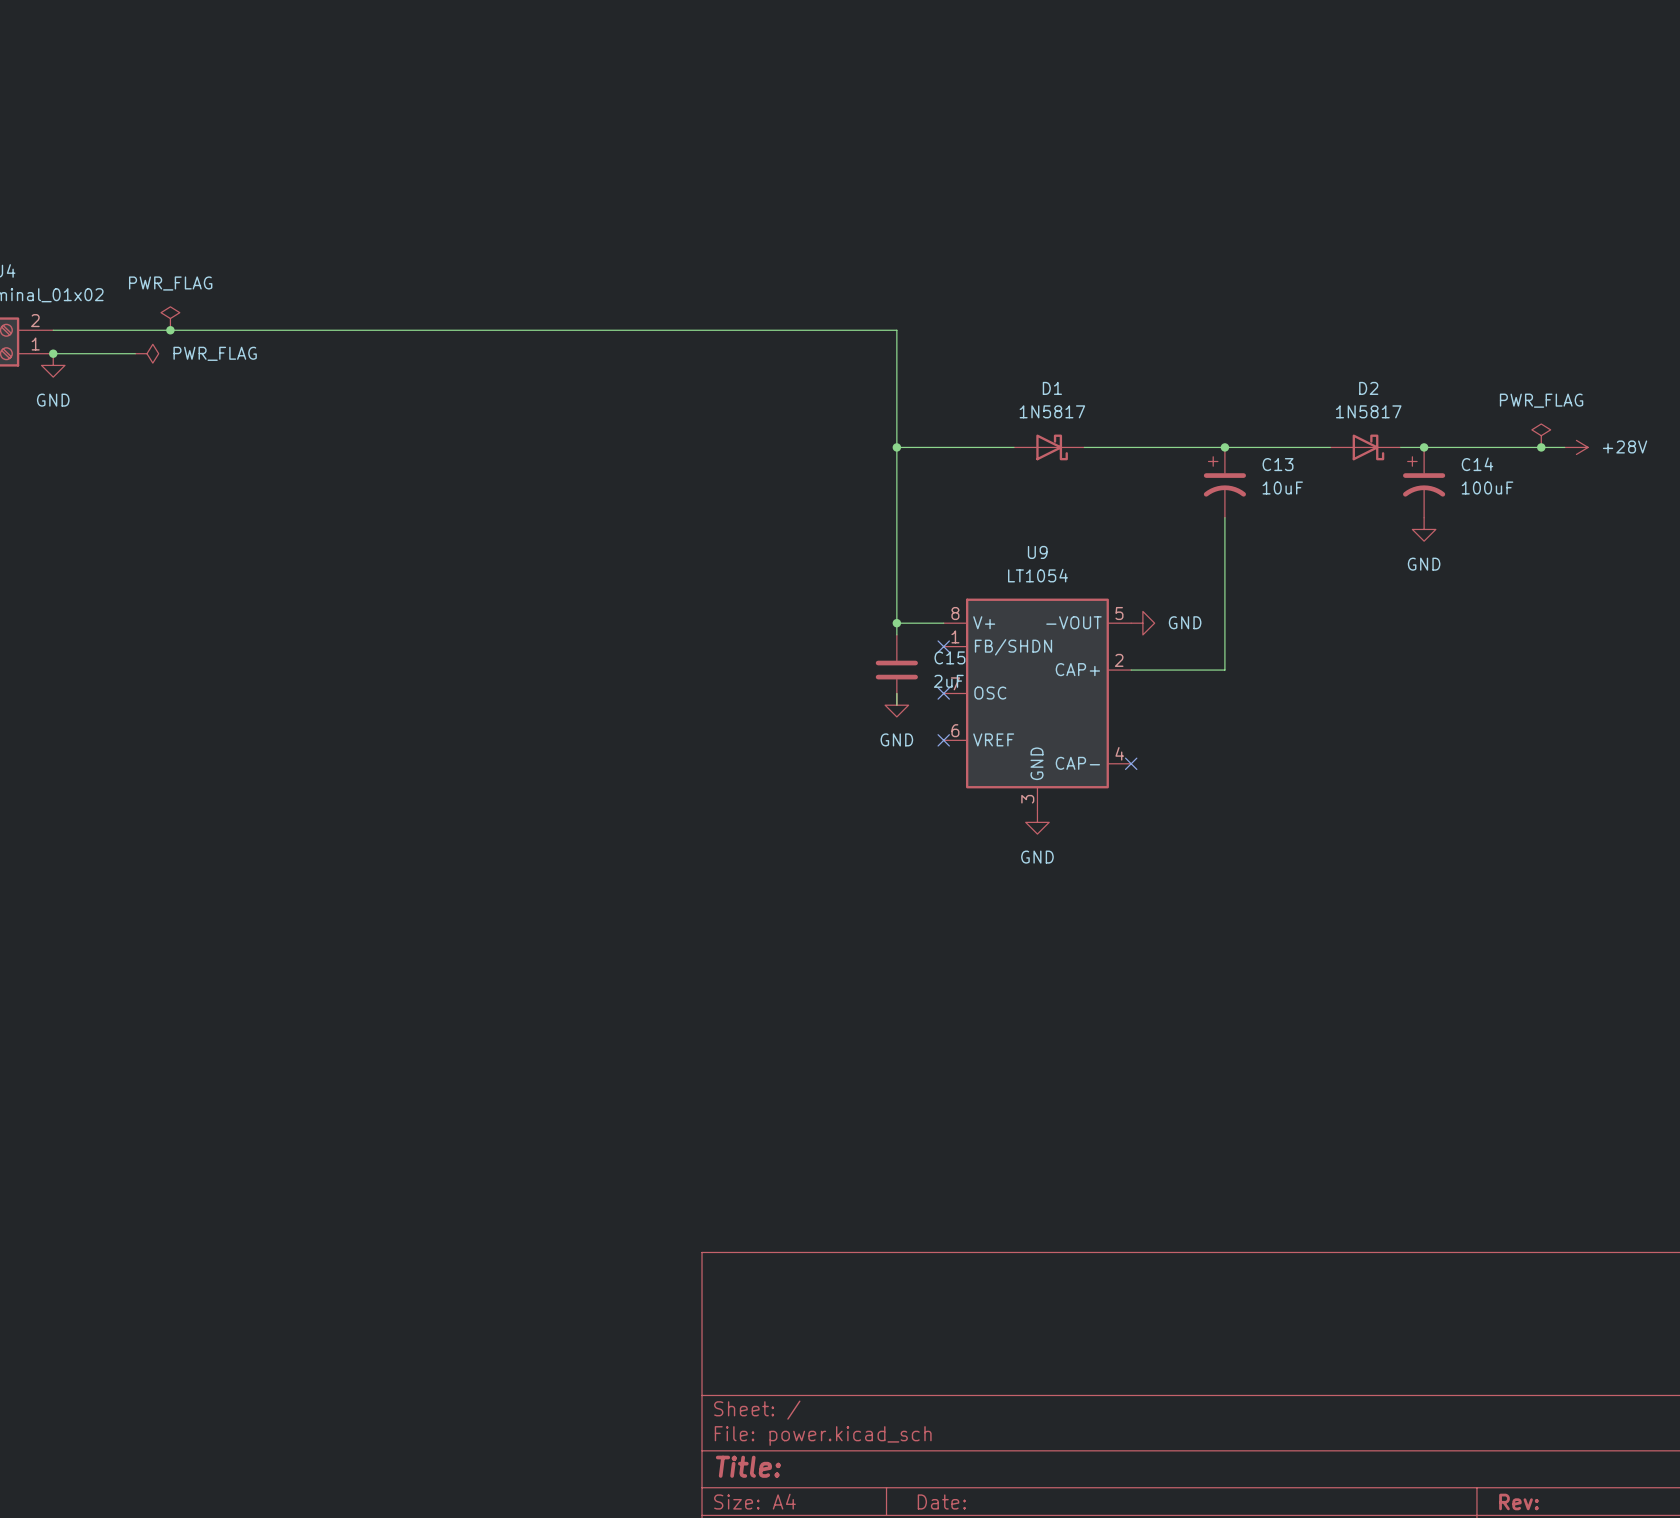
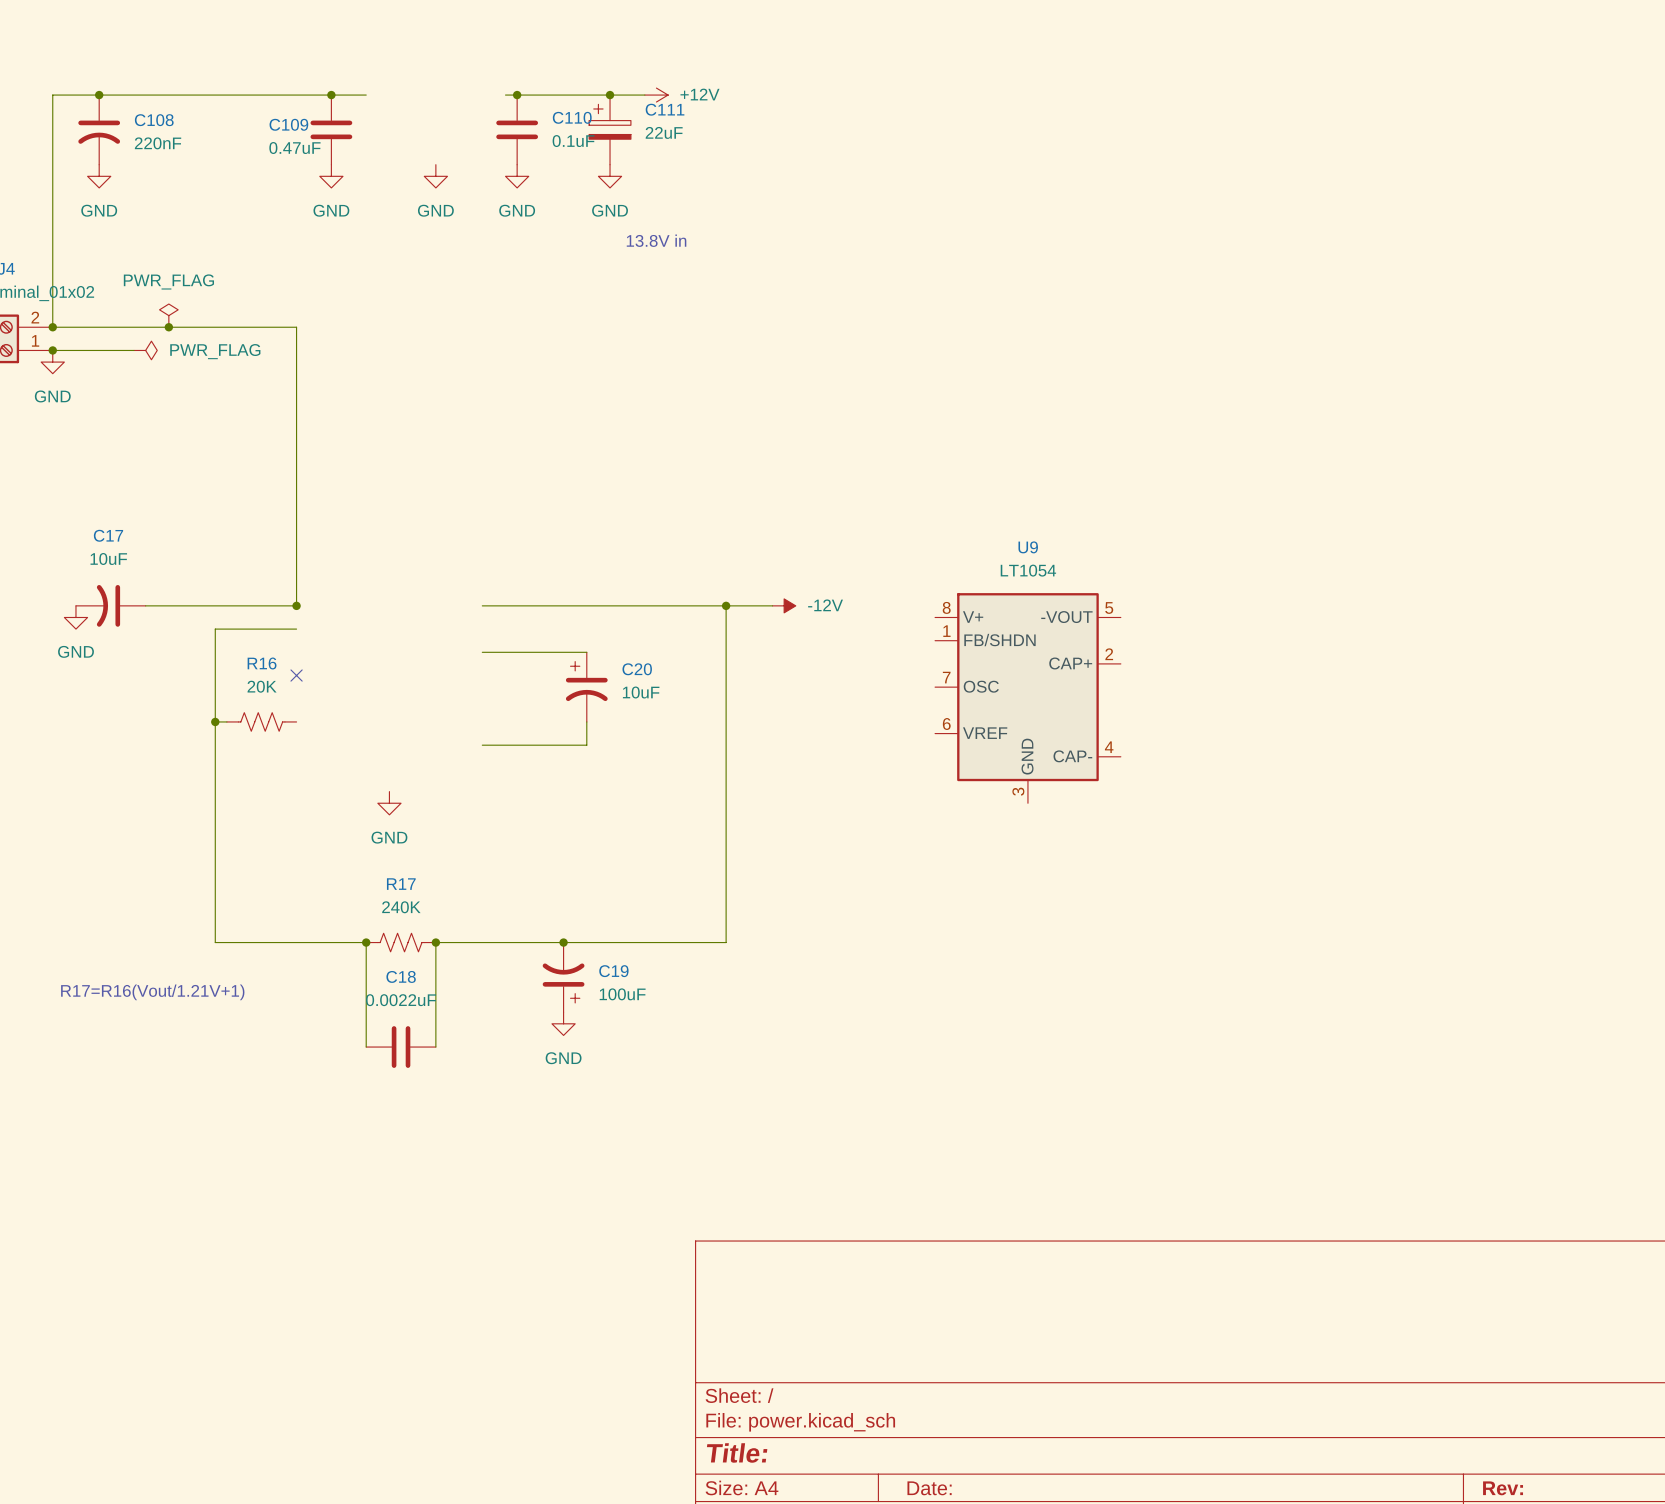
junction: none -> (99, 95)
junction: none -> (331, 95)
wire: none -> (366, 95) (52, 95) (52, 327)
wire: none -> (505, 95) (644, 95)
junction: none -> (517, 95)
junction: none -> (610, 95)
power symbol: none -> +12V (656, 95)
C108: none -> 220nF (99, 129)
C109: none -> 0.47uF (331, 129)
C110: none -> 0.1uF (517, 129)
C111: none -> 22uF (610, 129)
power symbol: none -> GND (99, 176)
power symbol: none -> GND (331, 176)
power symbol: none -> GND (435, 176)
power symbol: none -> GND (517, 176)
power symbol: none -> GND (610, 176)
text: none -> 13.8V in (656, 240)
junction: none -> (52, 327)
wire: (299, 330) (896, 330) (896, 634) -> (296, 327) (296, 605) (145, 605)
power symbol: PWR_FLAG (1541, 435) -> none
wire: (896, 447) (1014, 447) -> none
junction: (896, 447) -> none
D1: 1N5817 (1049, 447) -> none
wire: (1084, 447) (1330, 447) -> none
junction: (1224, 447) -> none
D2: 1N5817 (1365, 447) -> none
wire: (1400, 447) (1564, 447) -> none
junction: (1424, 447) -> none
junction: (1541, 447) -> none
power symbol: +28V (1576, 447) -> none
C13: 10uF (1224, 482) -> none
C14: 100uF (1424, 482) -> none
wire: (1224, 517) (1224, 670) (1131, 670) -> none
power symbol: GND (1424, 529) -> none
C17: none -> 10uF (110, 605)
junction: none -> (296, 605)
wire: none -> (482, 605) (772, 605)
wire: none -> (726, 605) (726, 942) (435, 942) (435, 1047)
junction: none -> (726, 605)
power symbol: none -> -12V (784, 605)
power symbol: none -> GND (75, 617)
wire: (896, 623) (943, 623) -> none
junction: (896, 623) -> none
power symbol: GND (1142, 623) -> none
wire: none -> (296, 629) (215, 629) (215, 942) (366, 942) (366, 1047)
no-connect mark: (943, 646) -> none
wire: none -> (482, 652) (586, 652)
C15: 2uF (896, 670) -> none
no-connect mark: none -> (296, 675)
C20: none -> 10uF (586, 687)
wire: (896, 693) (896, 705) -> none
no-connect mark: (943, 693) -> none
power symbol: GND (896, 705) -> none
wire: none -> (215, 721) (226, 721)
junction: none -> (215, 721)
R16: none -> 20K (261, 721)
wire: none -> (586, 721) (586, 745) (482, 745)
no-connect mark: (943, 740) -> none
no-connect mark: (1131, 763) -> none
power symbol: none -> GND (389, 803)
power symbol: GND (1037, 822) -> none
junction: none -> (366, 942)
R17: none -> 240K (401, 942)
junction: none -> (435, 942)
junction: none -> (563, 942)
C19: none -> 100uF (563, 977)
text: none -> R17=R16(Vout/1.21V+1) (152, 992)
power symbol: none -> GND (563, 1023)
C18: none -> 0.0022uF (401, 1047)

